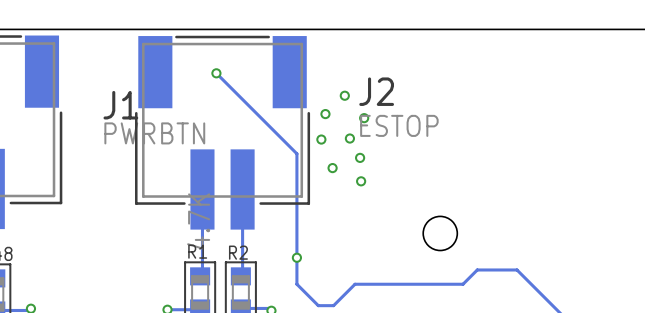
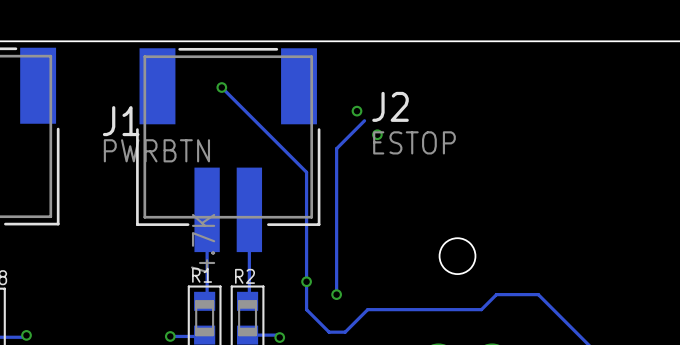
track: none -> (364, 120) (336, 148) (336, 294)
via: (325, 114) -> none
via: (349, 138) -> none
via: (321, 139) -> none
via: (360, 157) -> none
via: (332, 168) -> none
via: (361, 181) -> none
via: none -> (336, 294)

